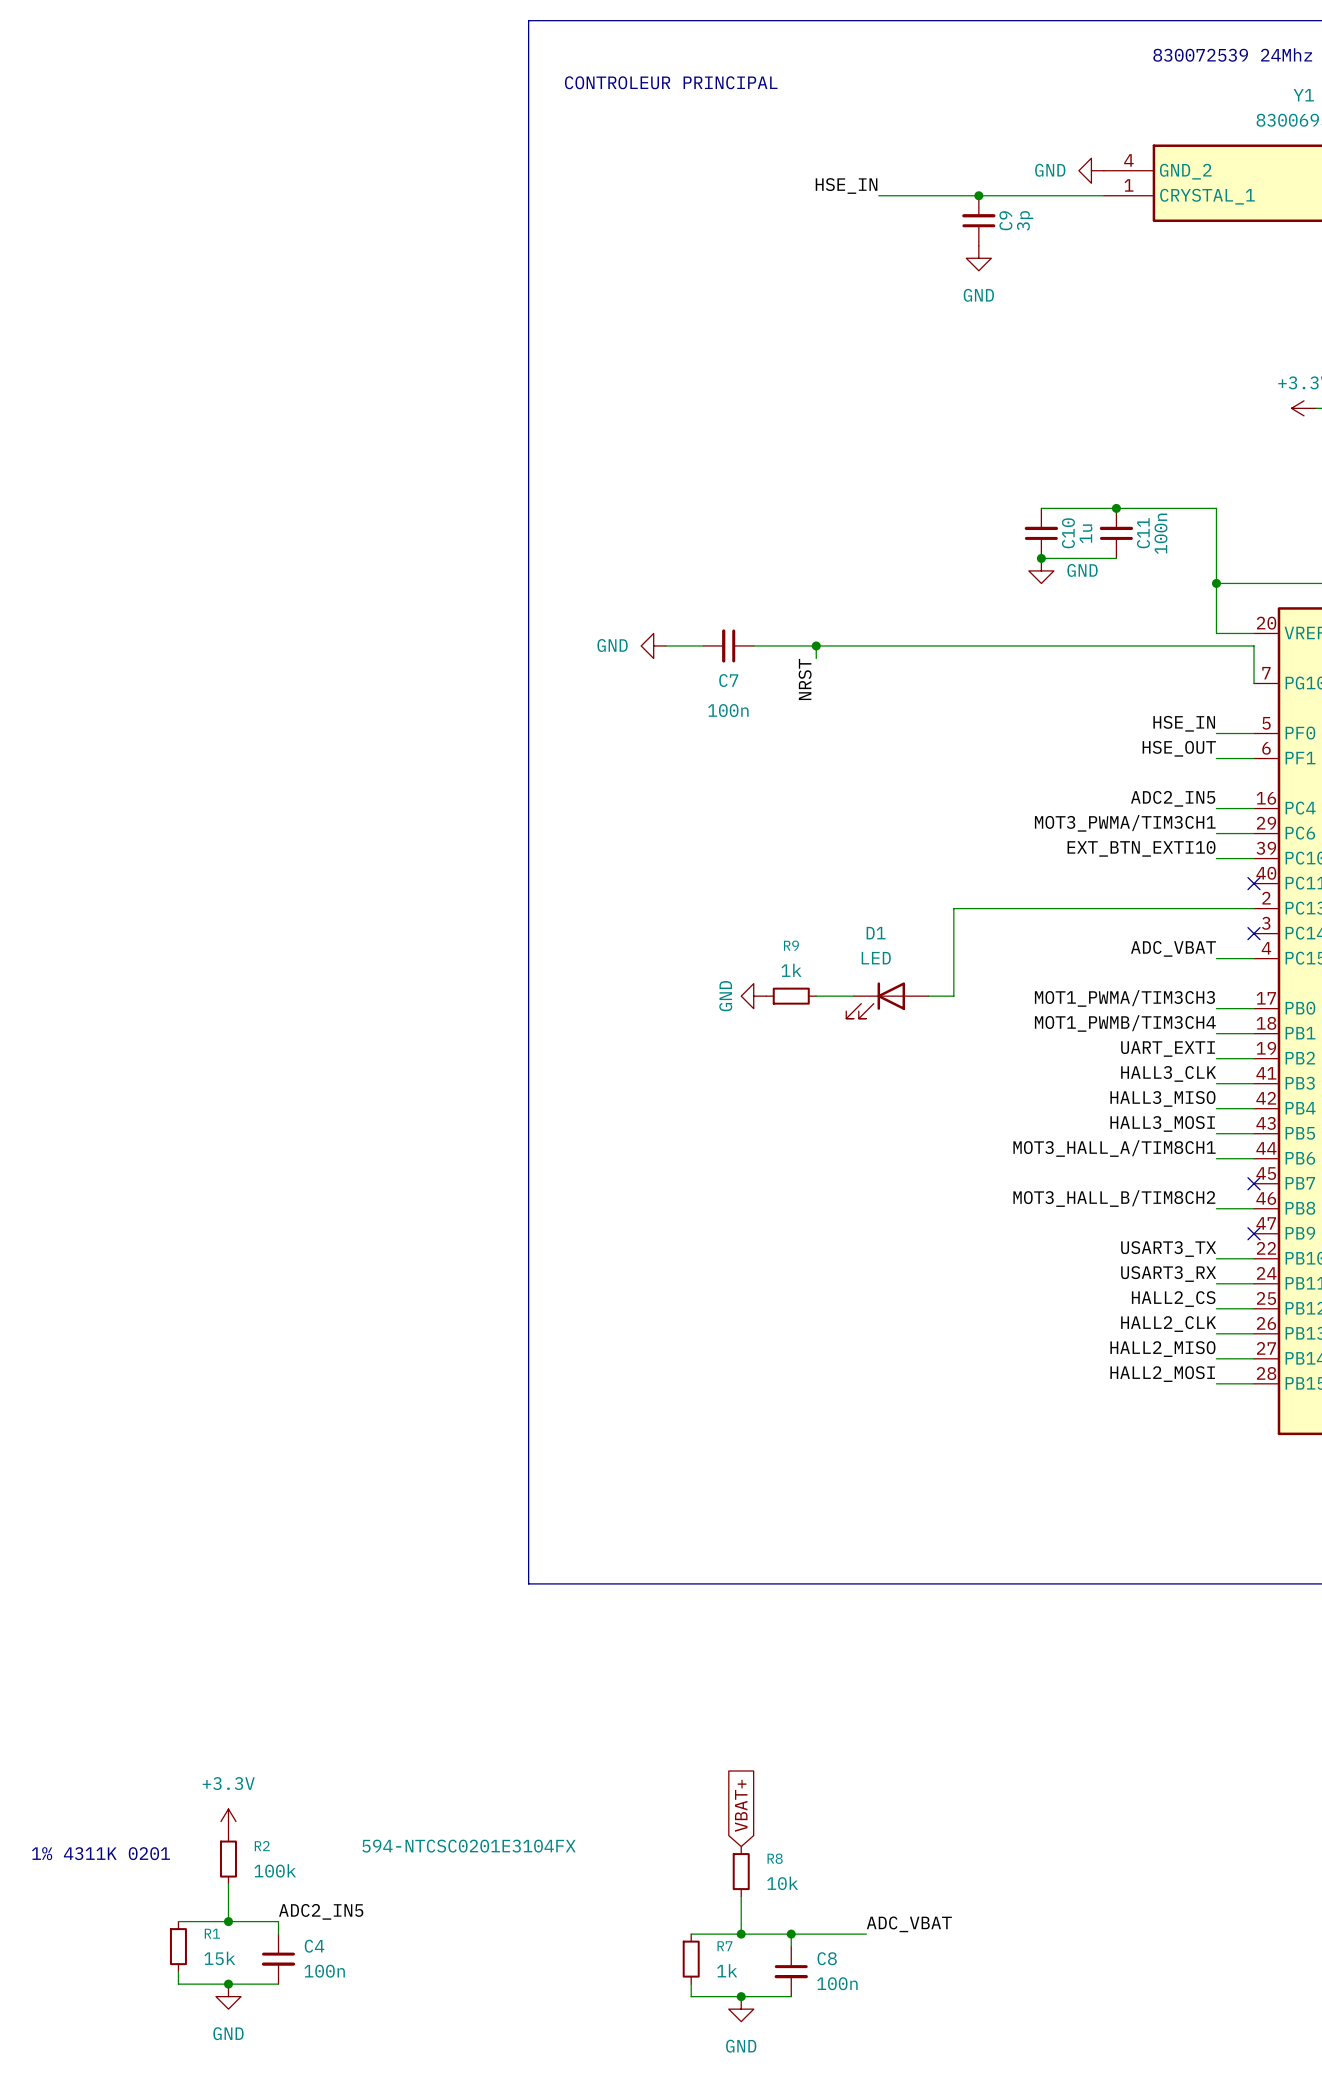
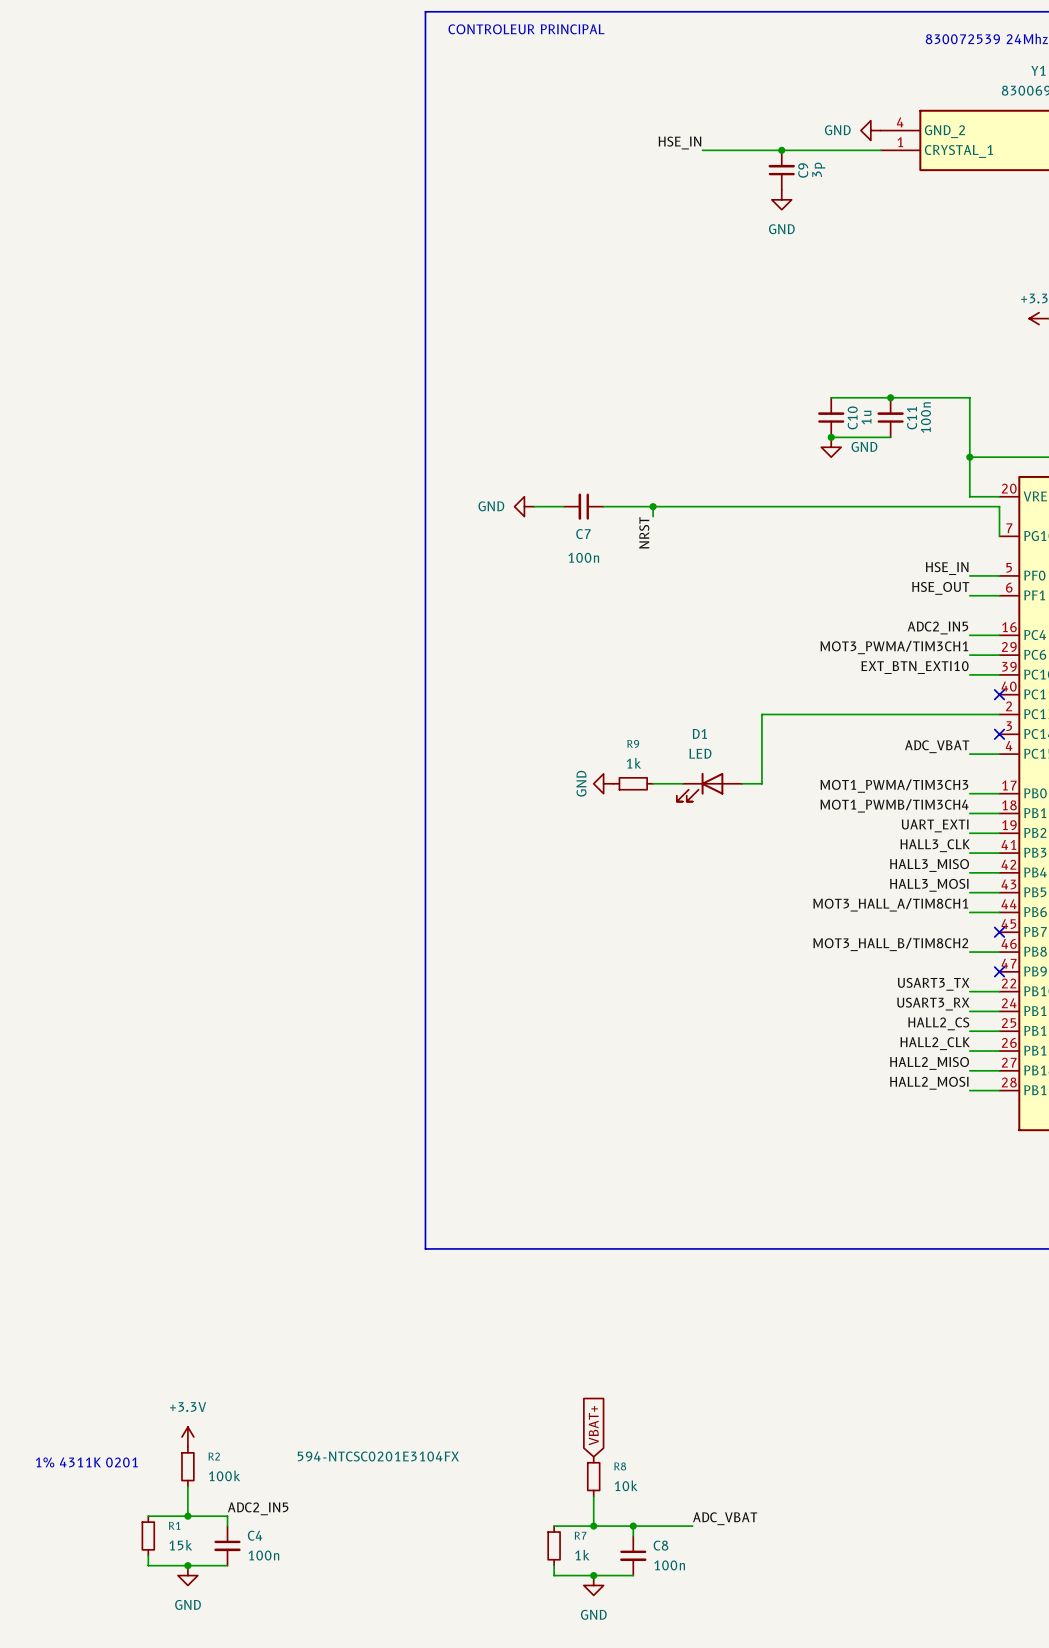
text position: CONTROLEUR PRINCIPAL (671, 82) -> CONTROLEUR PRINCIPAL (526, 29)

